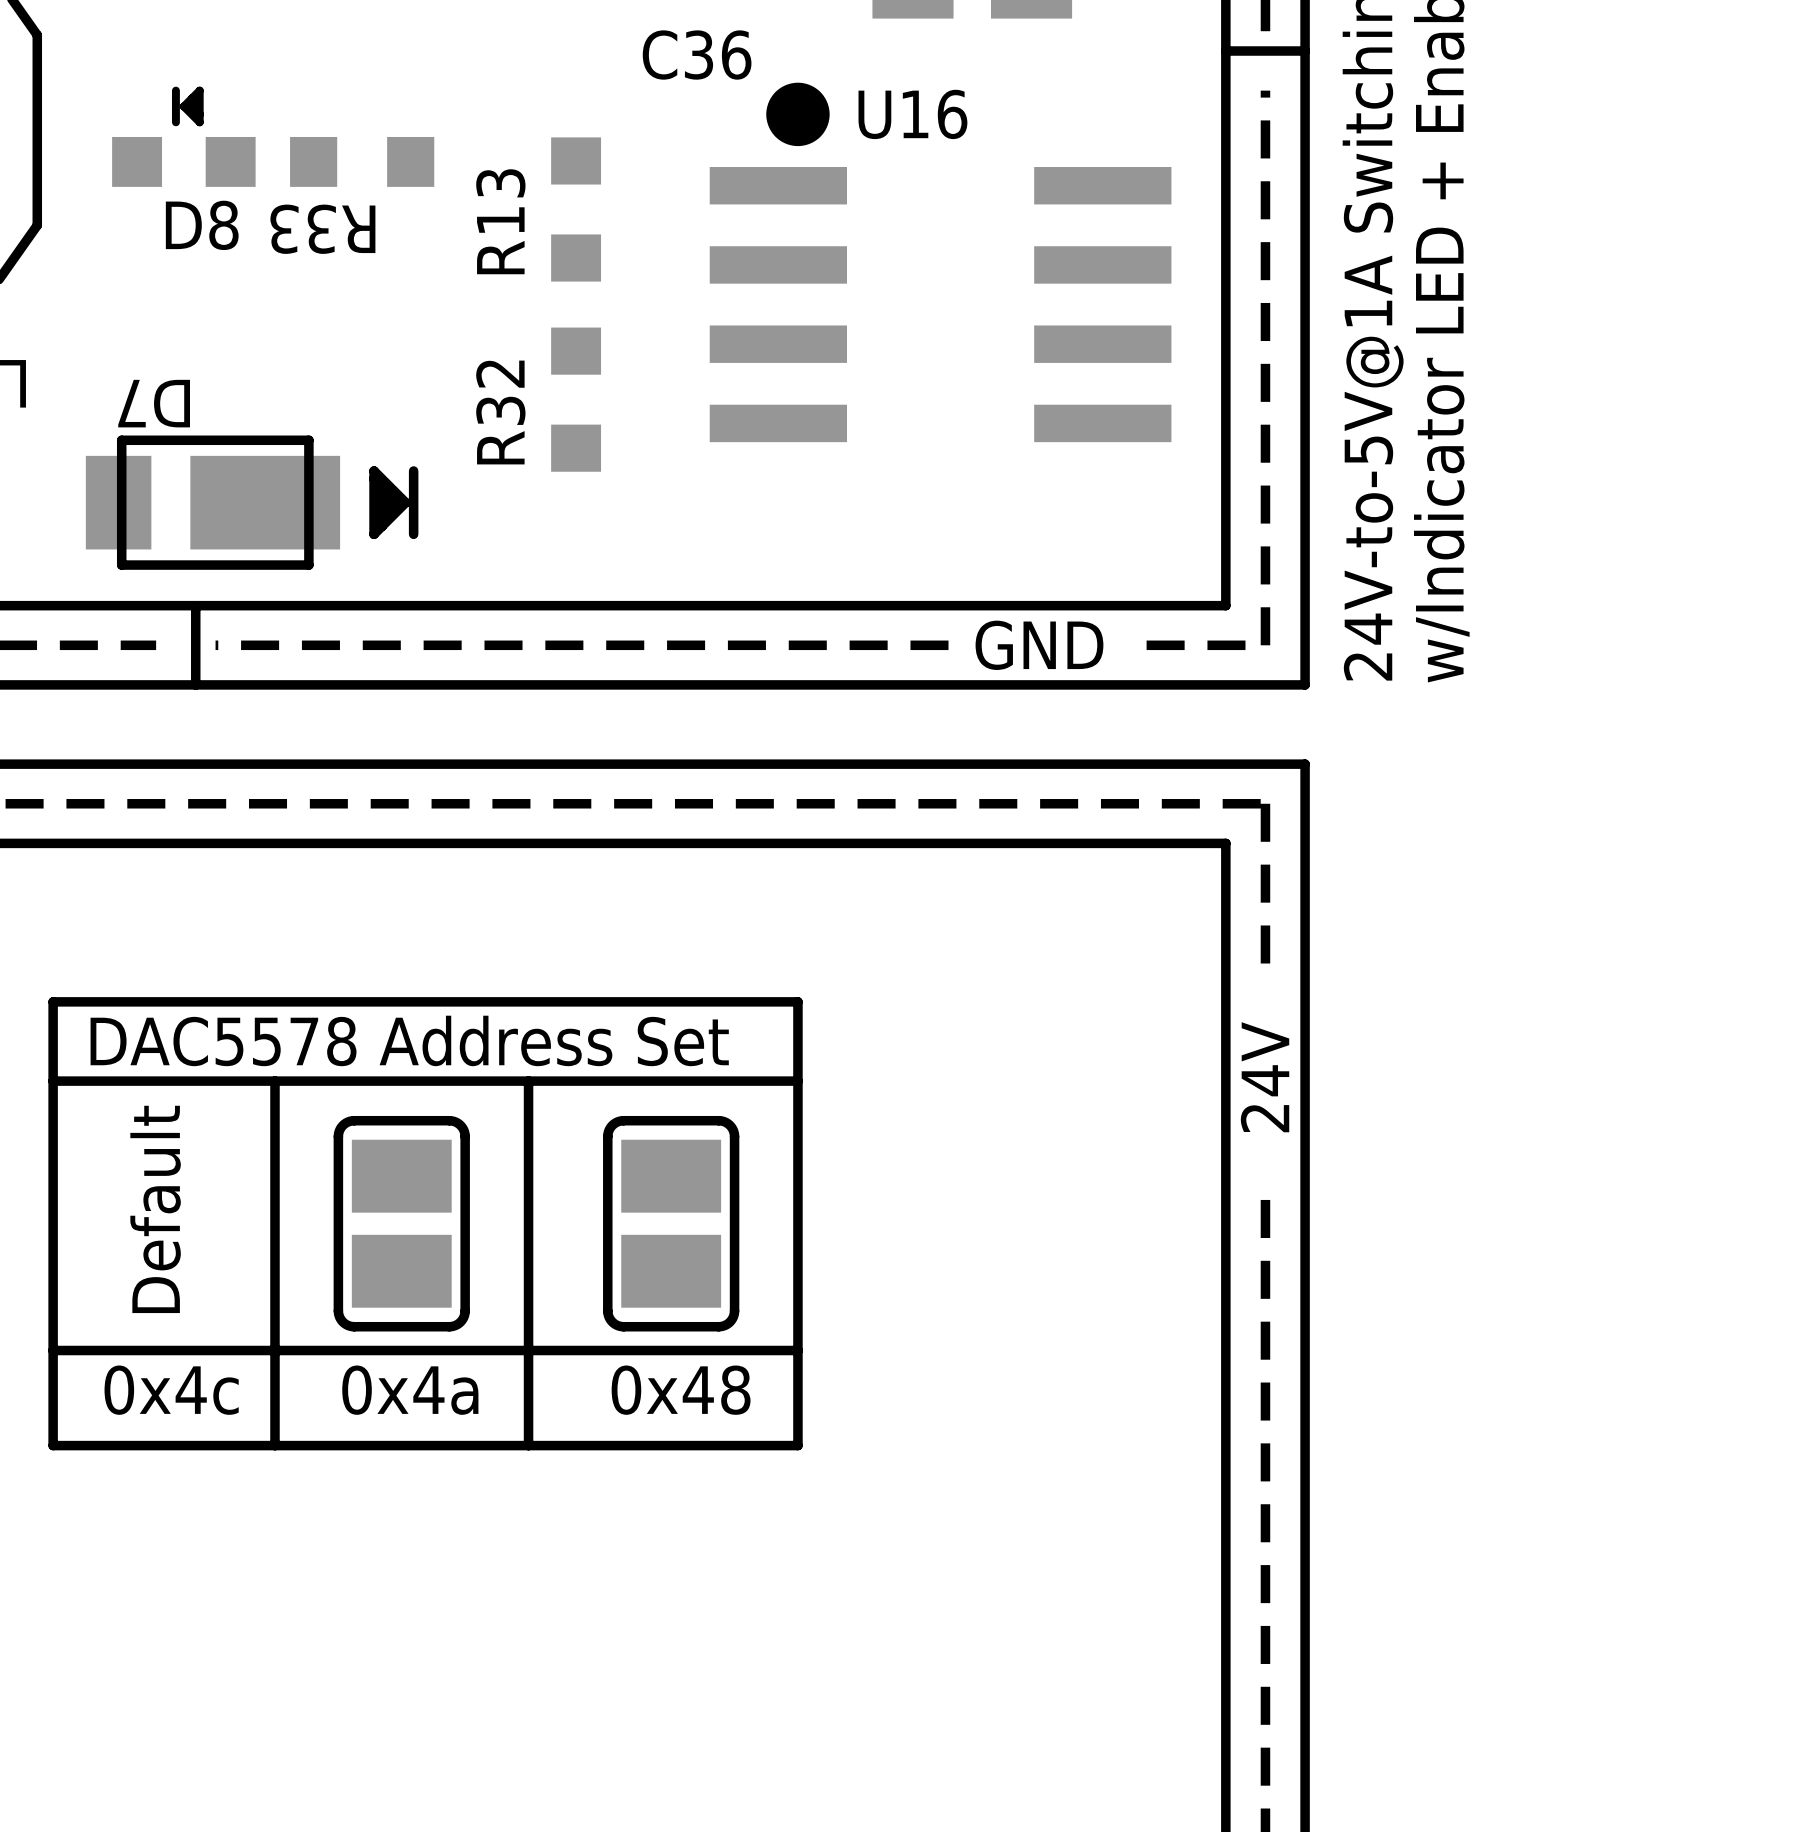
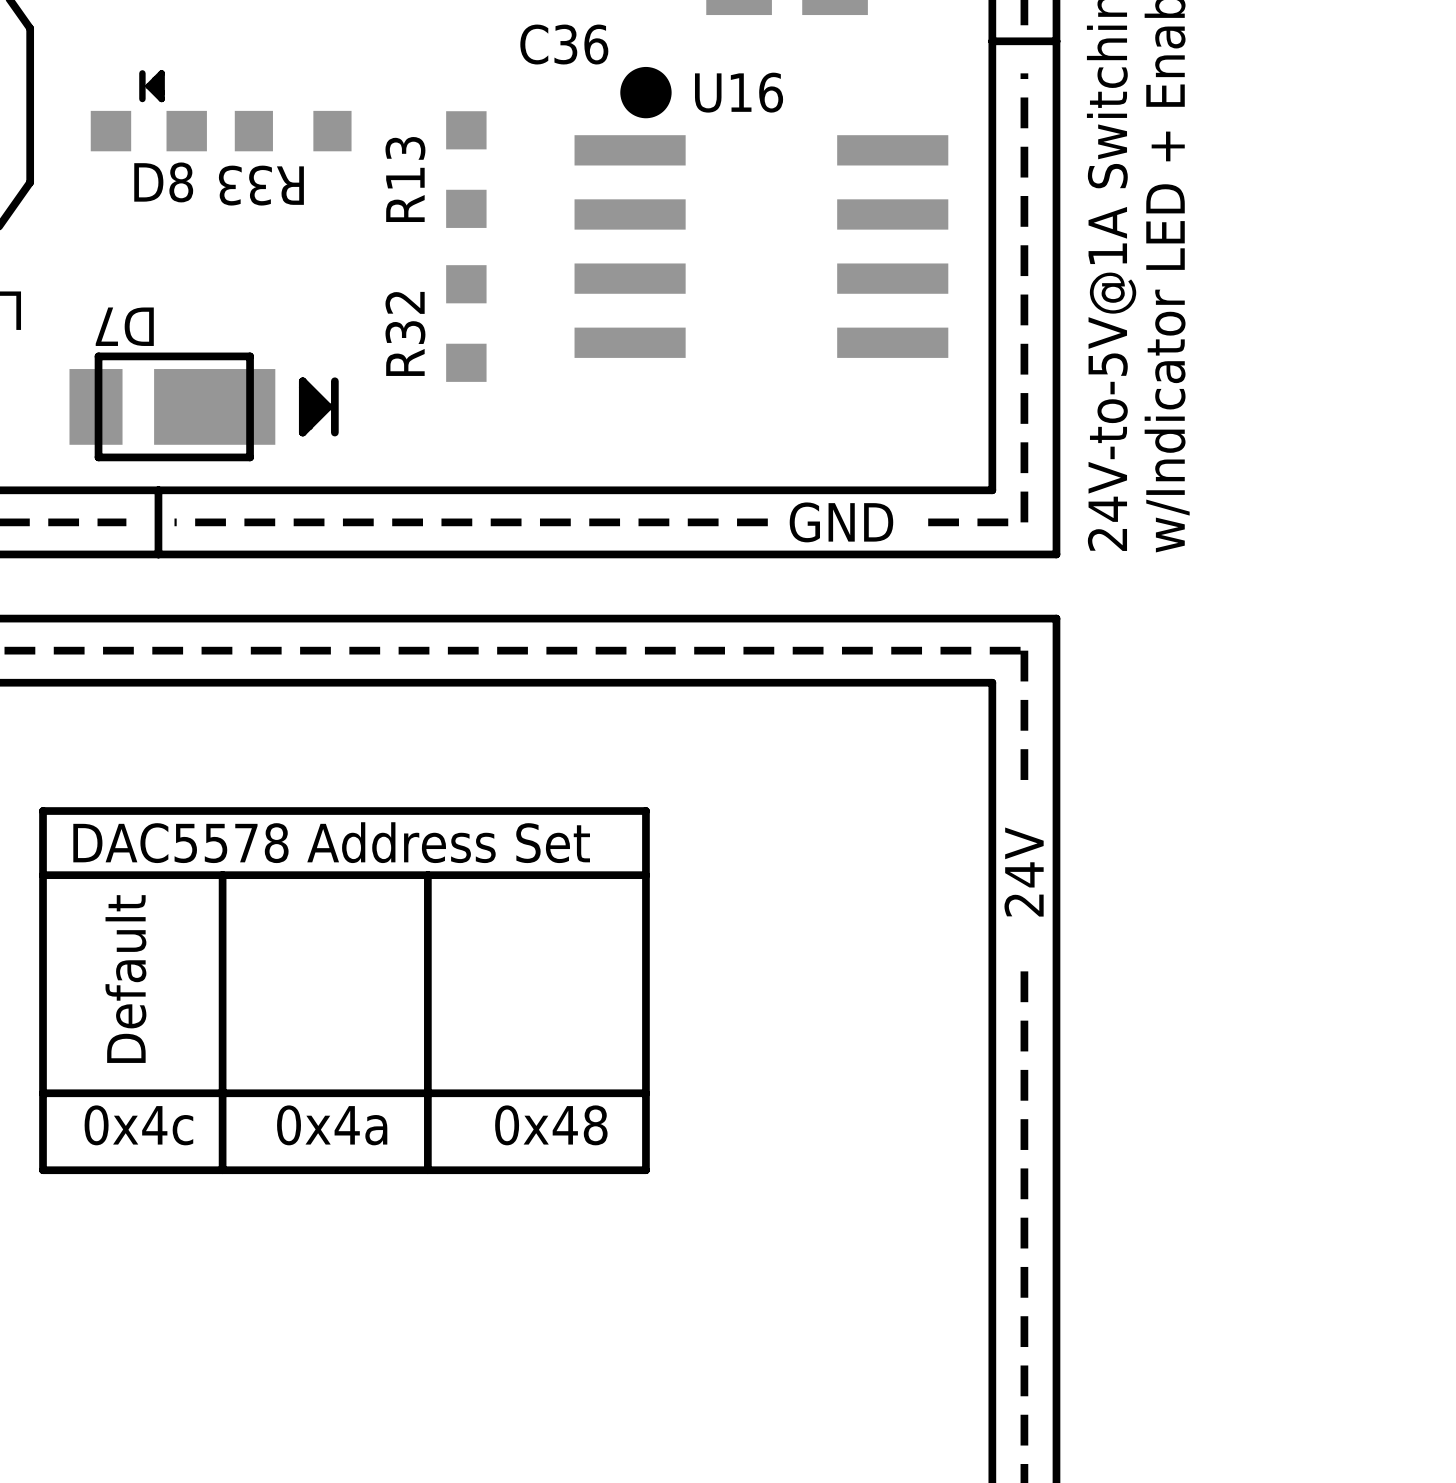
part: (401, 1223) -> none
part: (671, 1223) -> none

